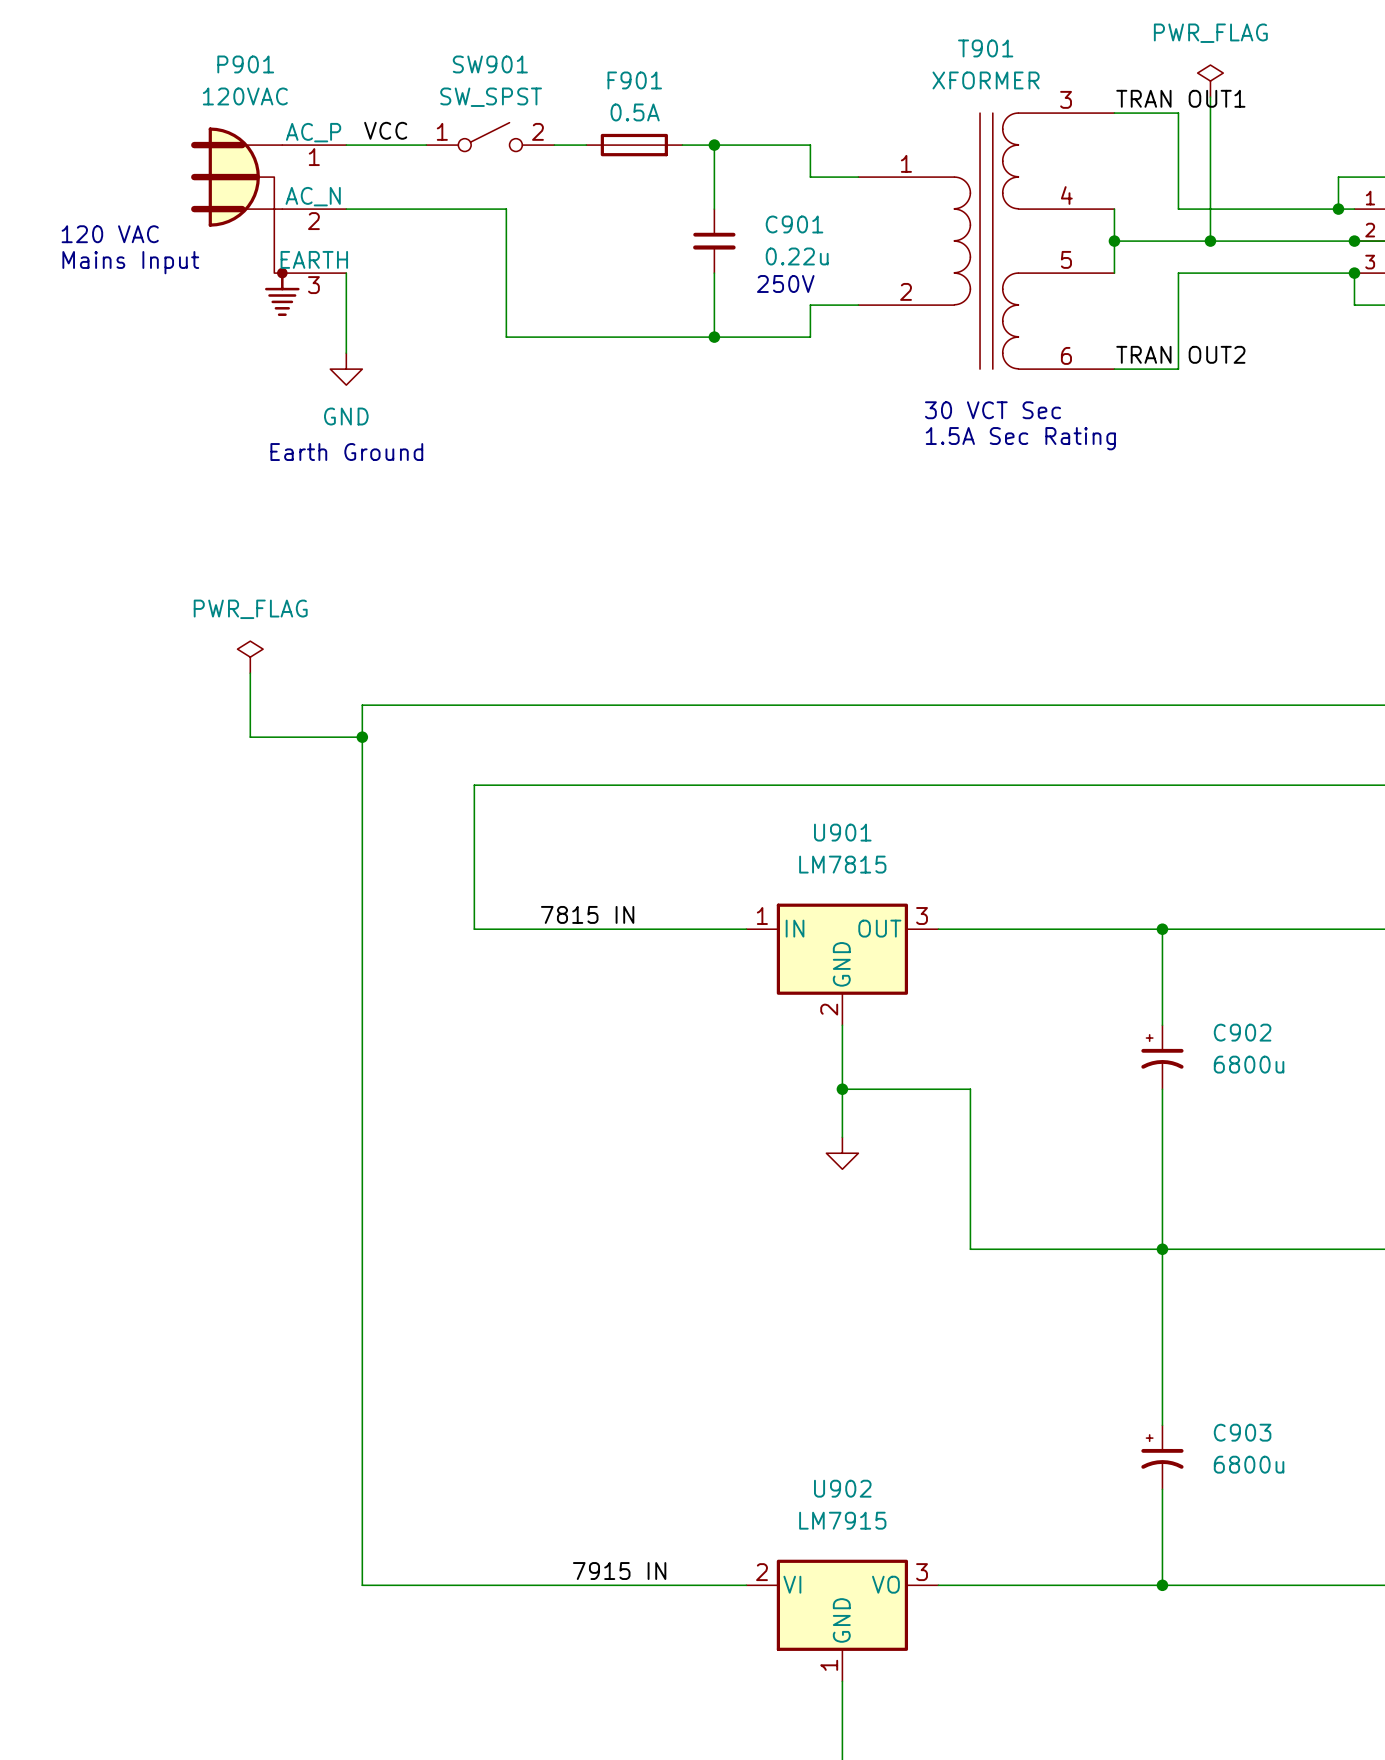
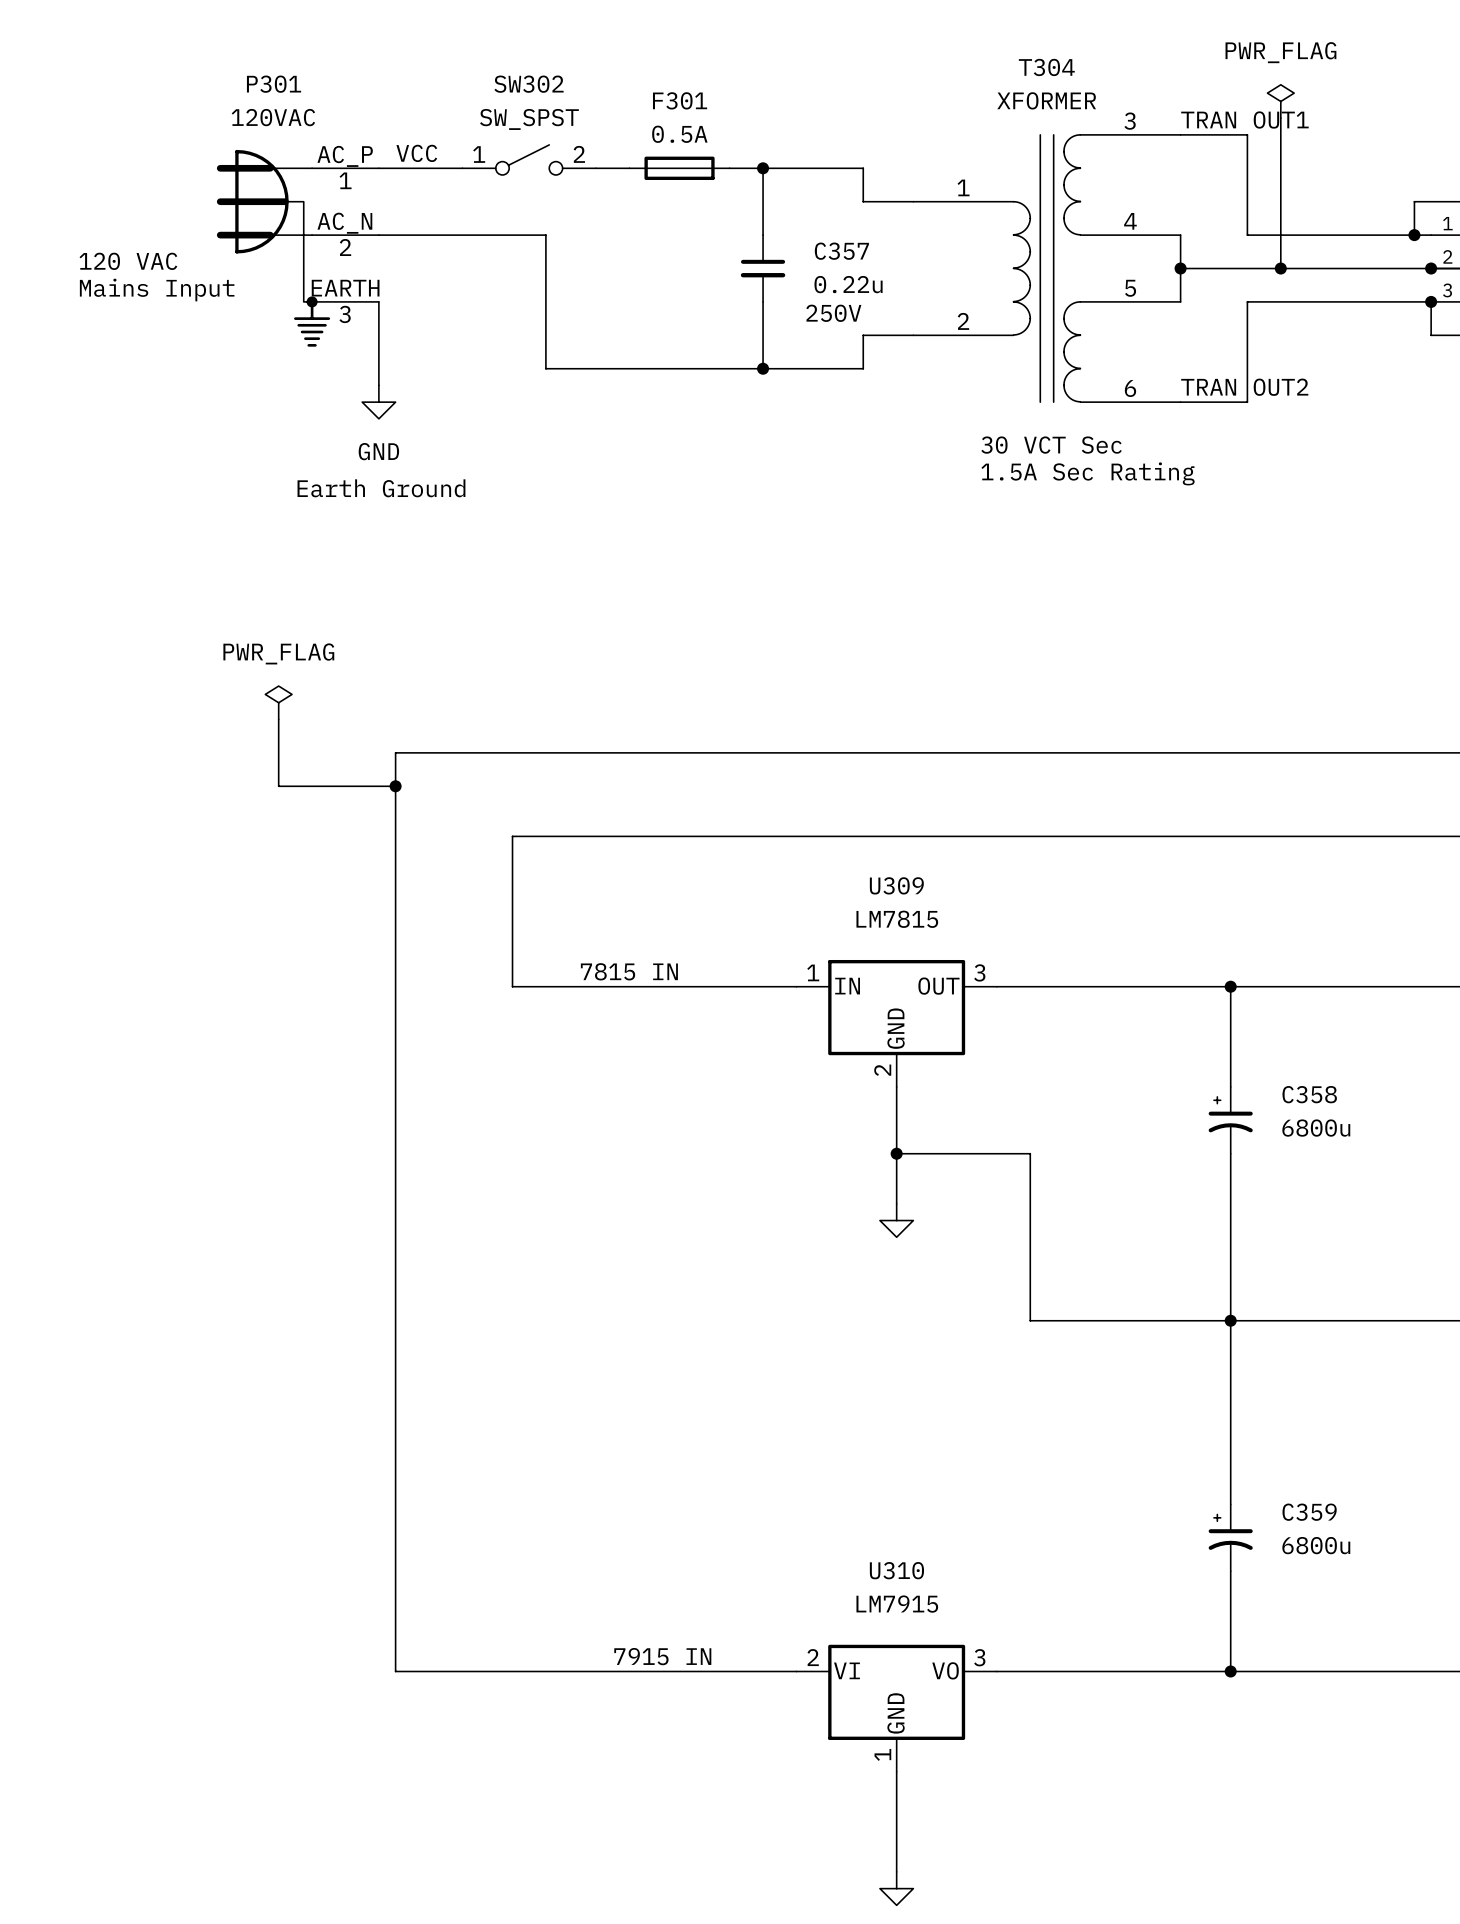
T901 name: T901 (985, 48) -> T304 (1046, 67)
P901 name: P901 (245, 64) -> P301 (274, 84)
SW901 name: SW901 (490, 64) -> SW302 (529, 84)
F901 name: F901 (634, 80) -> F301 (680, 100)
C901 name: C901 (794, 224) -> C357 (841, 251)
U901 name: U901 (842, 832) -> U309 (896, 885)
C902 name: C902 (1242, 1032) -> C358 (1309, 1094)
C903 name: C903 (1242, 1432) -> C359 (1309, 1512)
U902 name: U902 (842, 1488) -> U310 (896, 1570)

